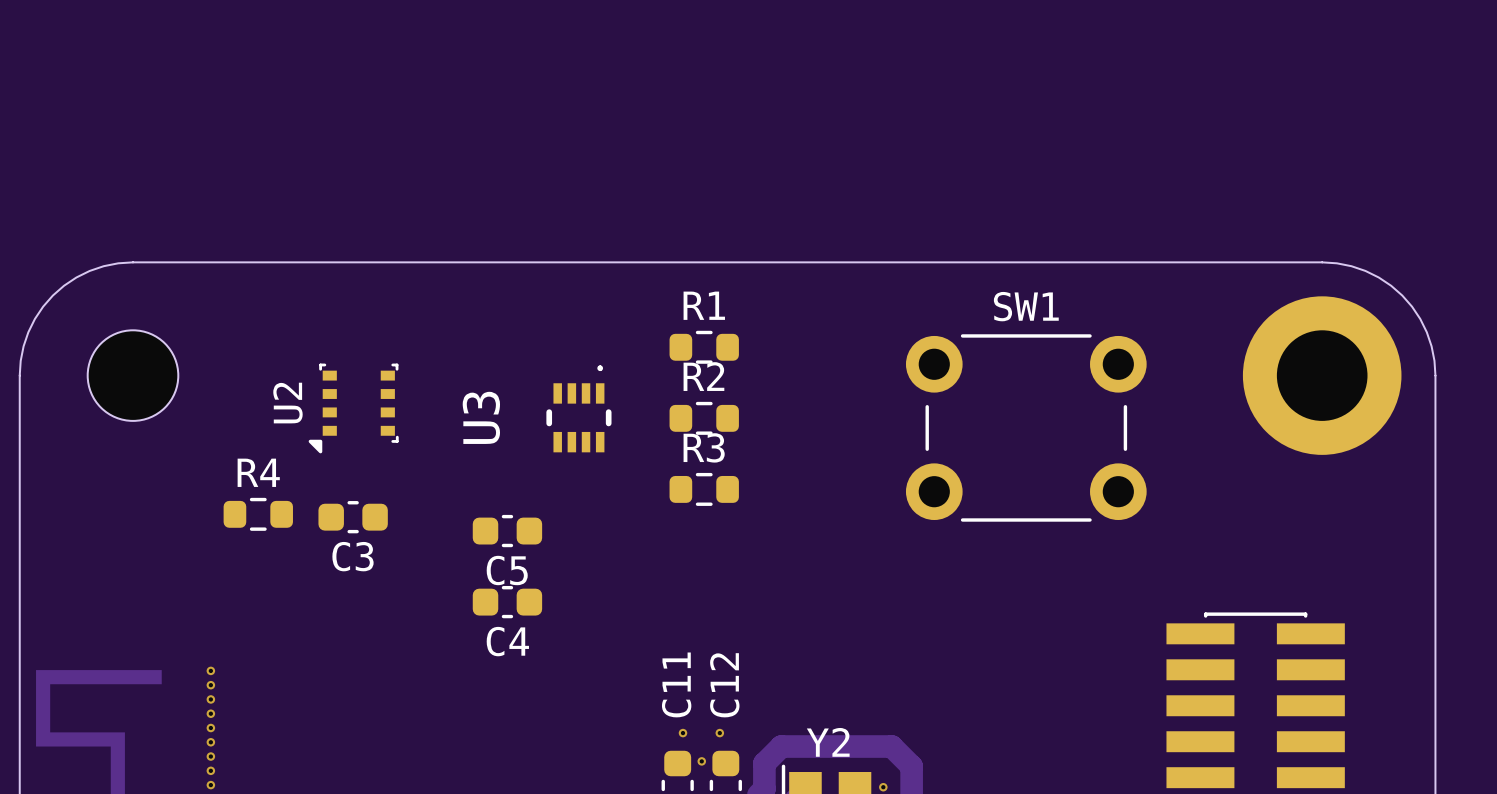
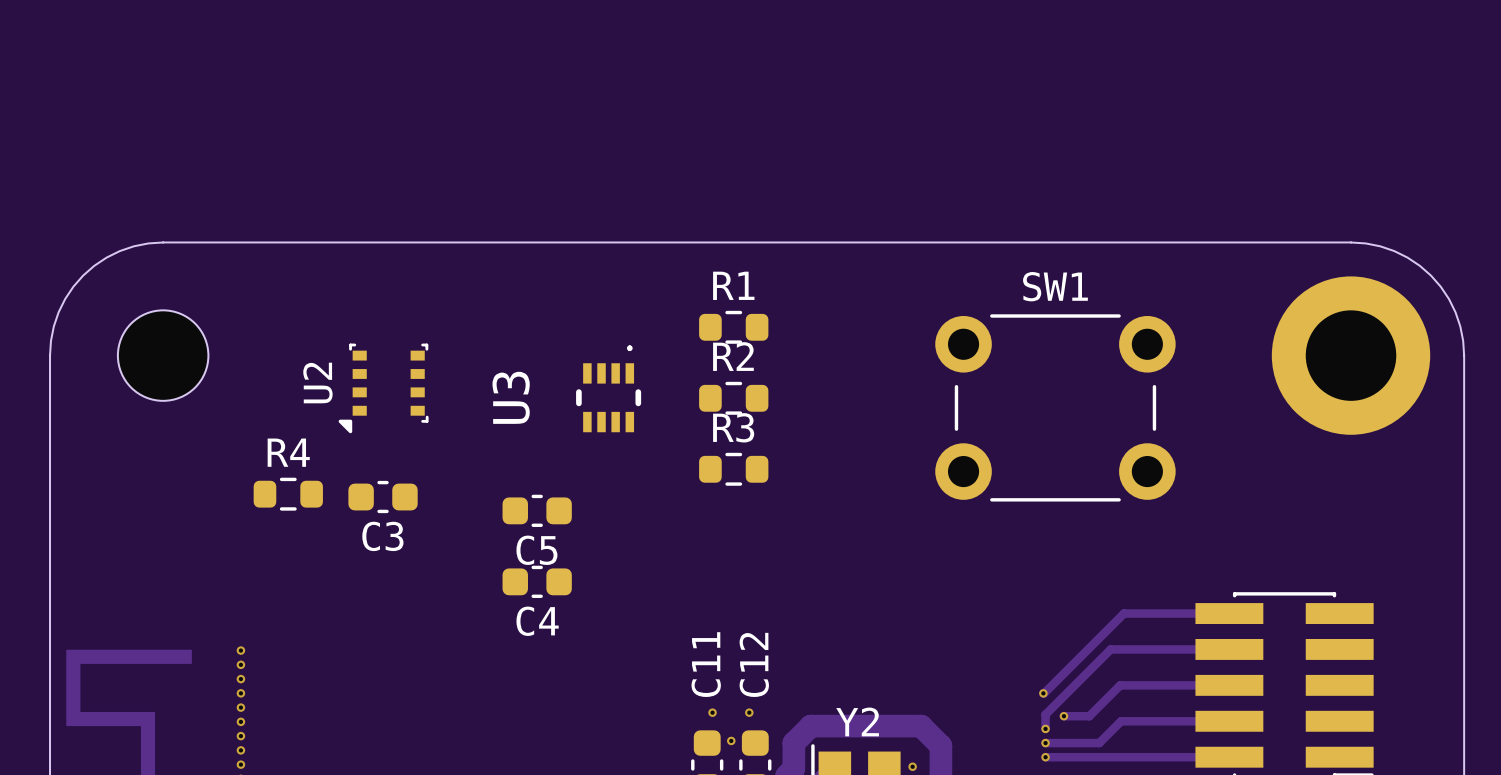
track: none -> (1229, 613) (1123, 613) (1043, 693)
track: none -> (1229, 649) (1110, 649) (1045, 714) (1045, 728)
track: none -> (1229, 685) (1120, 685) (1089, 716) (1063, 716)
via: none -> (1043, 693)
via: none -> (1063, 716)
track: none -> (1229, 721) (1121, 721) (1099, 743) (1045, 743)
via: none -> (1045, 728)
via: none -> (1045, 743)
track: none -> (1045, 757) (1229, 757)
via: none -> (1045, 757)

